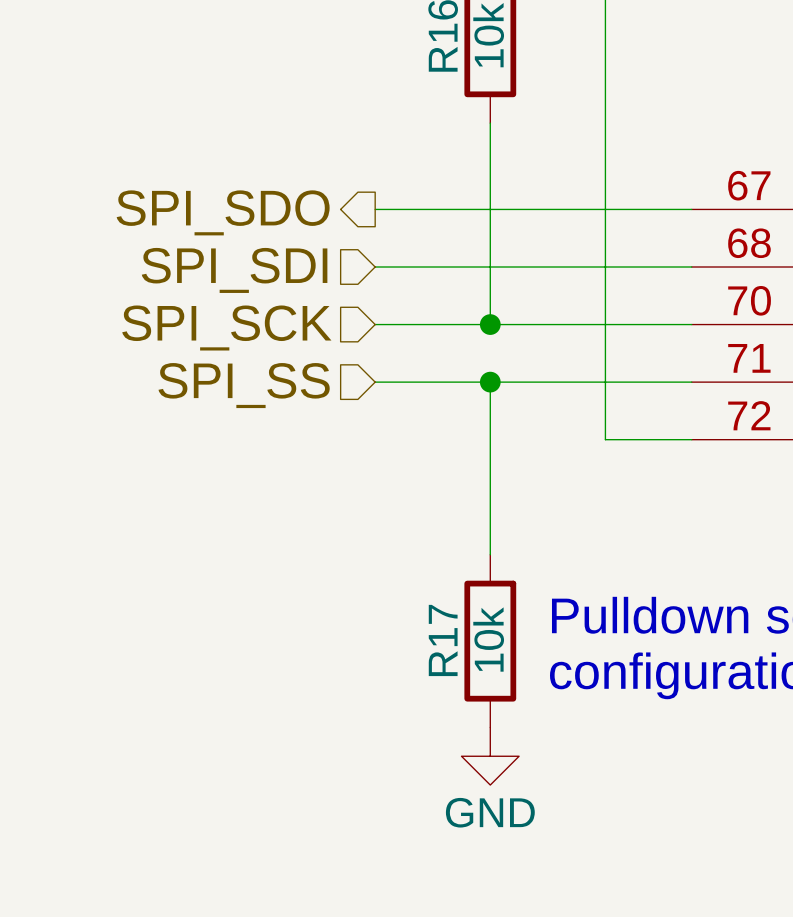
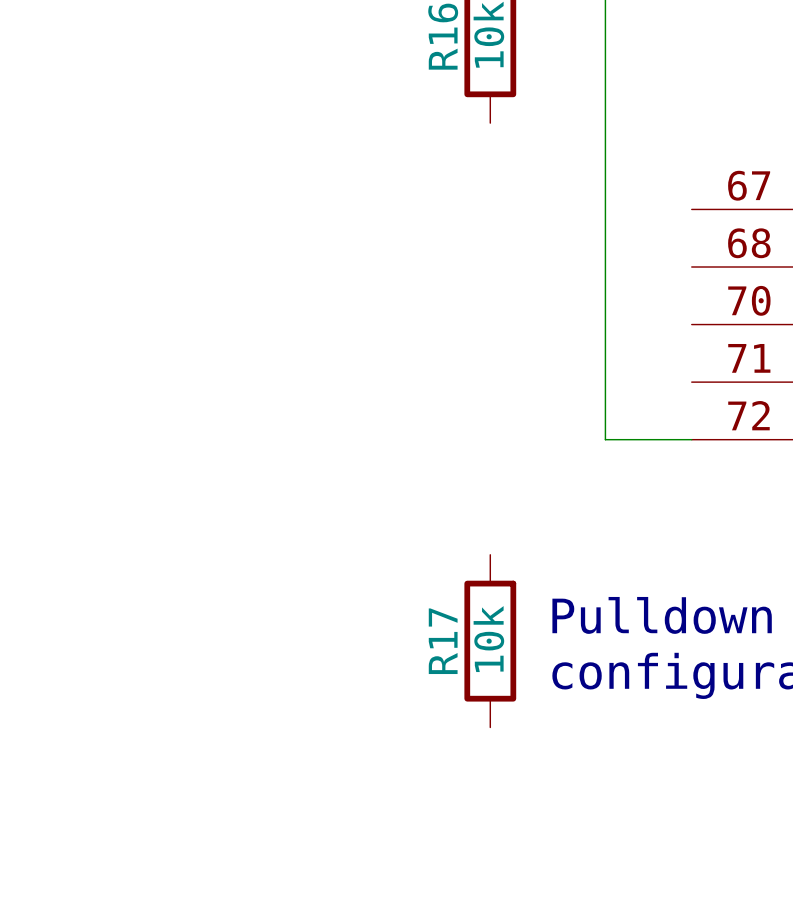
wire: (490, 123) (490, 324) -> none
wire: (375, 209) (691, 209) -> none
hierarchical label: SPI_SDO (223, 212) -> none
wire: (375, 267) (691, 267) -> none
hierarchical label: SPI_SDI (234, 270) -> none
wire: (375, 324) (691, 324) -> none
junction: (490, 324) -> none
hierarchical label: SPI_SCK (226, 327) -> none
wire: (375, 382) (691, 382) -> none
wire: (490, 382) (490, 554) -> none
junction: (490, 382) -> none
hierarchical label: SPI_SS (244, 385) -> none
power symbol: GND (490, 756) -> none

